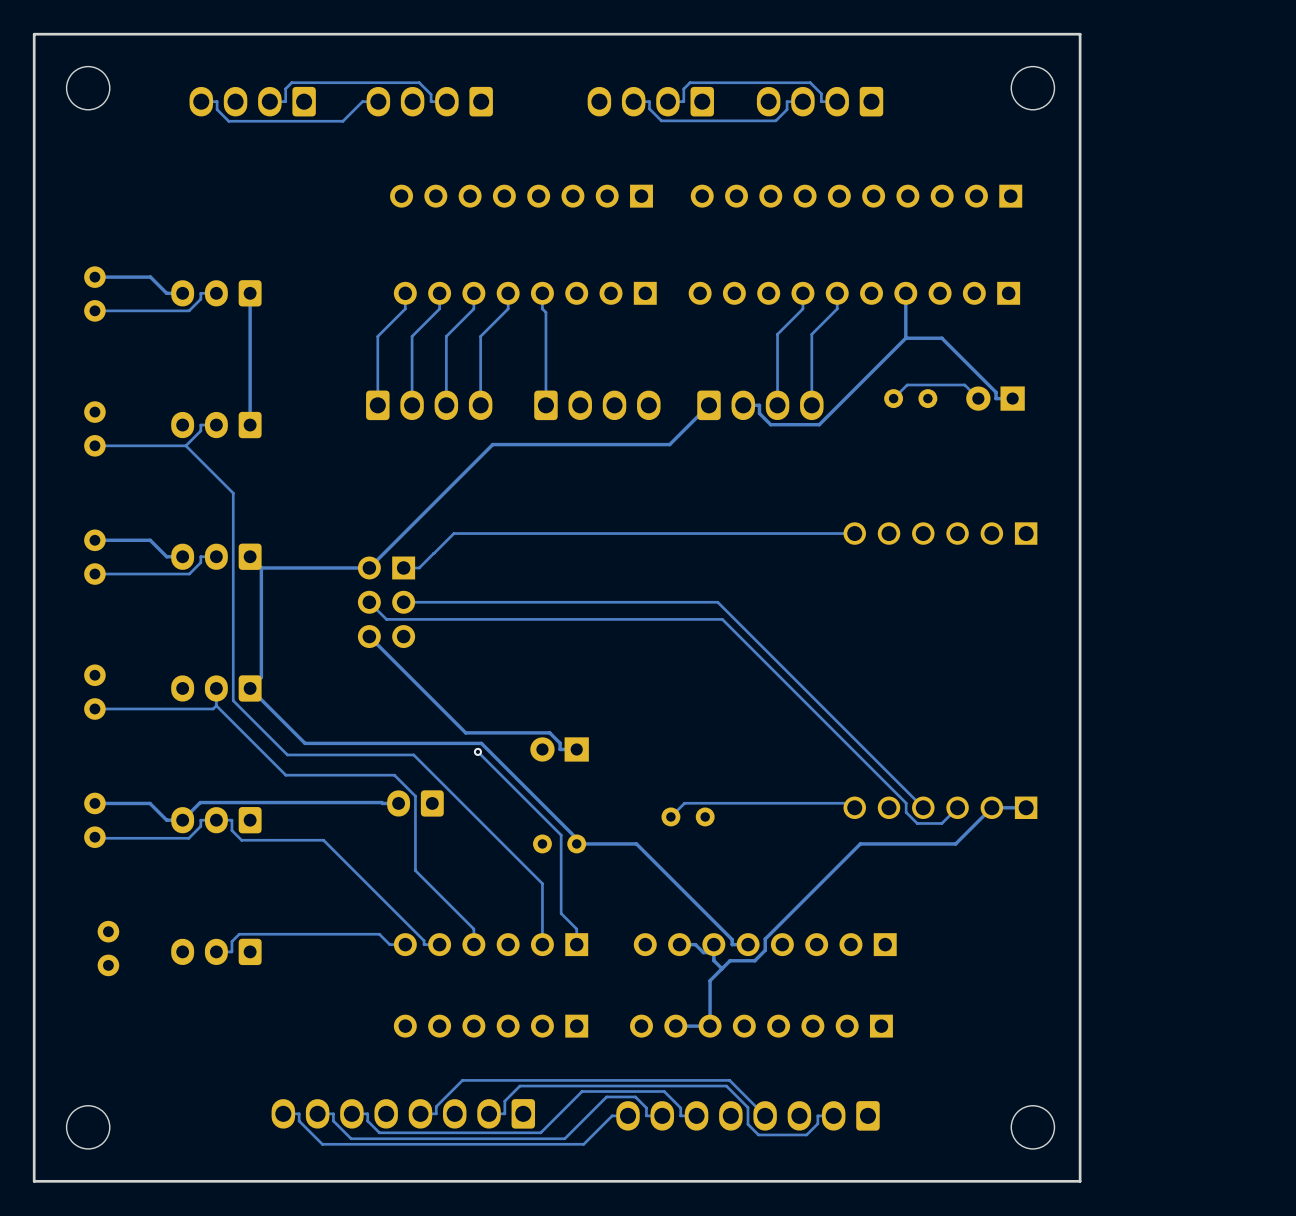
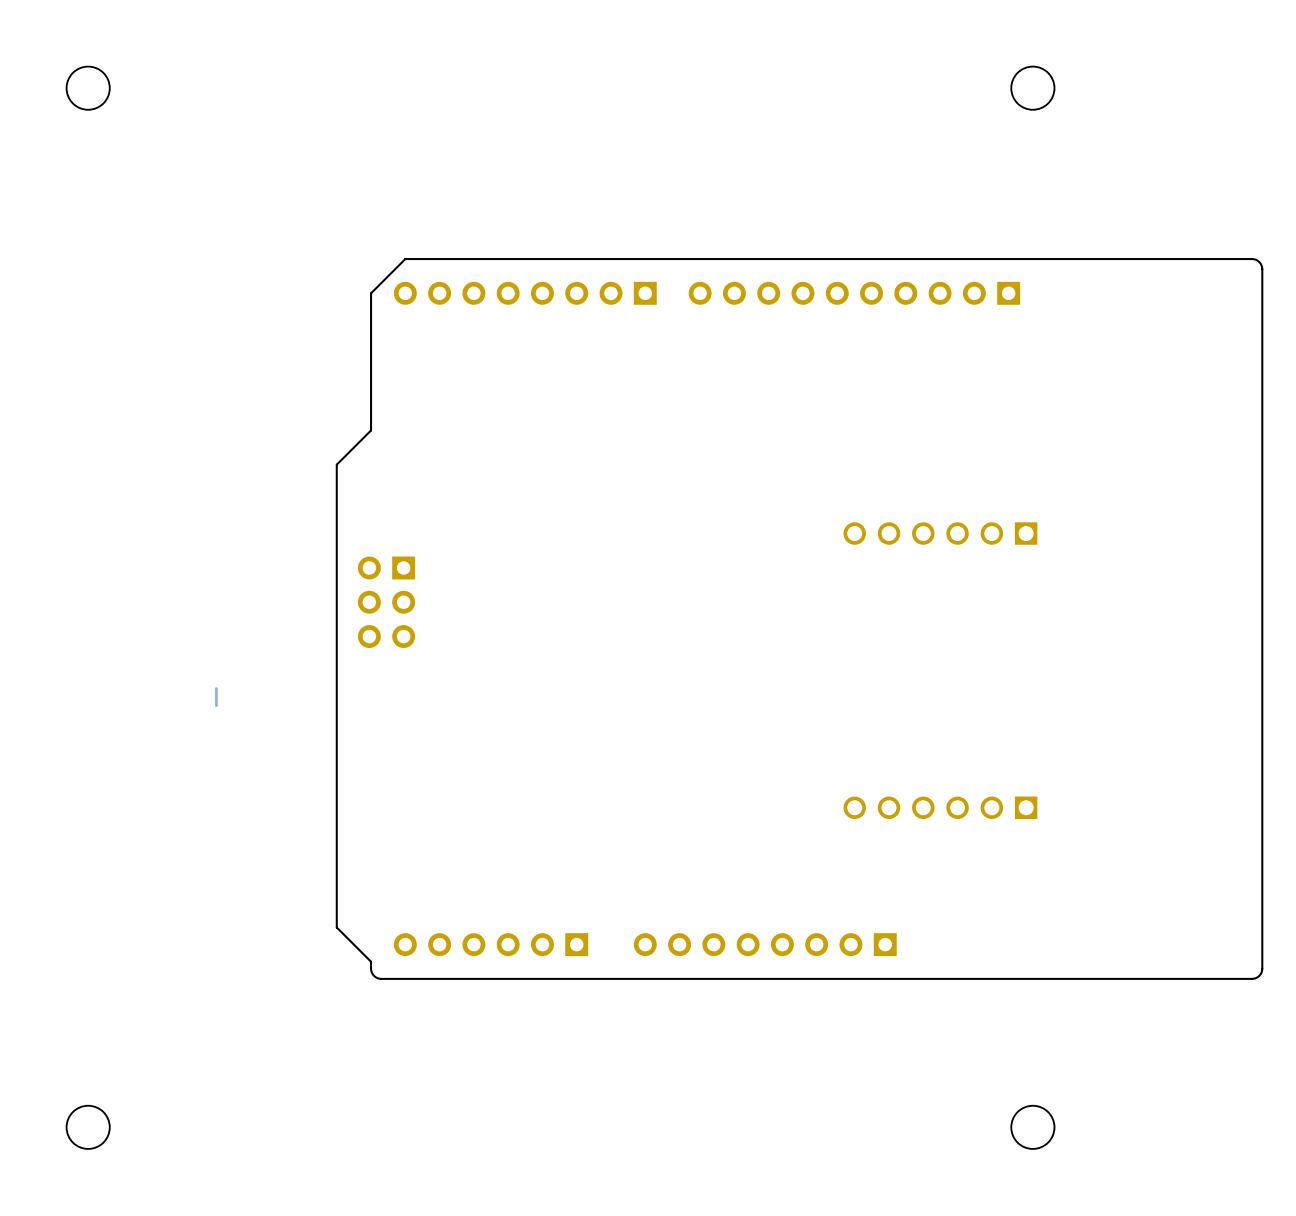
board edge: (1080, 34) (34, 34) (34, 1181) (1080, 1181) (1080, 34) -> none
part: (252, 101) -> none
track: (378, 101) (362, 101) (342, 121) (228, 121) (217, 109) (217, 101) (201, 101) -> none
part: (429, 101) -> none
track: (446, 101) (431, 101) (431, 94) (419, 82) (291, 82) (285, 88) (285, 101) (269, 101) -> none
part: (650, 101) -> none
track: (802, 101) (787, 101) (787, 109) (775, 120) (661, 120) (649, 108) (649, 101) (633, 101) -> none
part: (820, 101) -> none
track: (837, 101) (821, 101) (821, 93) (810, 82) (690, 82) (683, 88) (683, 101) (667, 101) -> none
part: (521, 196) -> none
part: (856, 196) -> none
board edge: none -> (1252, 259) (405, 259) (371, 293) (371, 430) (336, 464) (336, 927) (371, 961) (373, 974) (381, 978) (1252, 978) (1258, 976) (1262, 968) (1262, 269) (1259, 262) (1252, 259)
track: (94, 277) (150, 277) (166, 293) (182, 293) -> none
part: (94, 293) -> none
track: (216, 293) (200, 293) (200, 299) (189, 310) (94, 310) -> none
part: (216, 293) -> none
track: (250, 293) (250, 425) -> none
track: (405, 293) (405, 308) (377, 336) (377, 405) -> none
track: (439, 293) (439, 308) (412, 336) (412, 405) -> none
track: (473, 293) (473, 308) (446, 336) (446, 405) -> none
track: (508, 293) (508, 308) (480, 336) (480, 405) -> none
track: (542, 293) (542, 308) (545, 312) (545, 405) -> none
track: (802, 293) (802, 308) (777, 334) (777, 405) -> none
track: (837, 293) (837, 308) (811, 334) (811, 405) -> none
track: (905, 293) (905, 338) -> none
track: (905, 338) (941, 338) (996, 392) (996, 398) (1012, 398) -> none
track: (905, 338) (819, 424) (770, 424) (759, 413) (759, 405) (743, 405) -> none
part: (910, 398) -> none
track: (978, 398) (964, 384) (907, 384) (893, 398) -> none
part: (995, 398) -> none
part: (429, 405) -> none
part: (597, 405) -> none
track: (708, 405) (669, 444) (492, 444) (369, 567) (261, 567) -> none
part: (760, 405) -> none
track: (216, 425) (200, 425) (200, 430) (185, 445) -> none
part: (216, 425) -> none
part: (94, 428) -> none
track: (185, 445) (233, 493) (233, 700) (287, 754) (413, 754) (542, 883) (542, 944) -> none
track: (185, 445) (94, 445) -> none
track: (854, 533) (453, 533) (433, 553) -> none
track: (94, 540) (150, 540) (166, 556) (182, 556) -> none
track: (433, 553) (419, 567) (403, 567) -> none
track: (216, 556) (200, 556) (200, 562) (189, 574) (94, 574) -> none
part: (216, 556) -> none
part: (94, 557) -> none
track: (261, 567) (261, 677) (250, 688) (305, 743) (481, 743) (576, 838) (576, 843) (636, 843) (732, 939) (732, 944) (748, 944) -> none
track: (369, 602) (386, 619) (722, 619) (906, 803) (906, 812) (917, 823) (941, 823) (957, 807) -> none
track: (403, 602) (717, 602) (923, 807) -> none
track: (369, 636) (465, 732) (549, 732) (560, 743) (560, 749) (576, 749) -> none
part: (216, 688) -> none
part: (94, 692) -> none
track: (94, 708) (213, 708) (216, 705) (285, 775) (394, 775) (415, 796) (415, 870) (473, 929) (473, 944) -> none
part: (559, 749) -> none
track: (477, 751) (561, 835) (561, 913) (576, 929) (576, 944) -> none
via: (477, 751) -> none
track: (398, 803) (200, 802) (182, 820) (166, 820) (149, 803) (94, 803) -> none
part: (415, 803) -> none
track: (854, 807) (850, 803) (684, 803) (670, 816) -> none
track: (1026, 807) (991, 807) (955, 843) (860, 843) (765, 939) (765, 950) (754, 960) (729, 960) (722, 968) -> none
part: (688, 816) -> none
part: (94, 820) -> none
part: (216, 820) -> none
track: (94, 837) (188, 838) (200, 826) (200, 820) (231, 820) (231, 830) (241, 840) (323, 840) (424, 940) (424, 944) (439, 944) -> none
part: (559, 843) -> none
track: (405, 944) (389, 944) (379, 934) (239, 934) (231, 941) (231, 951) (216, 951) -> none
track: (679, 944) (695, 944) (703, 952) (713, 952) -> none
track: (713, 944) (713, 960) (722, 968) -> none
part: (108, 948) -> none
part: (216, 951) -> none
track: (722, 968) (710, 980) (710, 1026) (675, 1026) -> none
part: (491, 1026) -> none
part: (761, 1026) -> none
track: (283, 1113) (299, 1113) (299, 1121) (322, 1144) (583, 1144) (612, 1115) (628, 1115) -> none
track: (317, 1113) (333, 1113) (333, 1121) (351, 1138) (564, 1138) (606, 1096) (635, 1096) (646, 1107) (646, 1115) (662, 1115) -> none
track: (351, 1113) (367, 1113) (367, 1121) (379, 1132) (540, 1132) (582, 1091) (664, 1091) (680, 1107) (680, 1115) (696, 1115) -> none
part: (403, 1113) -> none
track: (420, 1113) (436, 1113) (436, 1106) (462, 1080) (729, 1080) (765, 1115) -> none
track: (489, 1113) (504, 1113) (504, 1101) (519, 1086) (726, 1086) (747, 1107) (747, 1124) (758, 1134) (806, 1134) (817, 1123) (817, 1115) (833, 1115) -> none
part: (747, 1115) -> none

